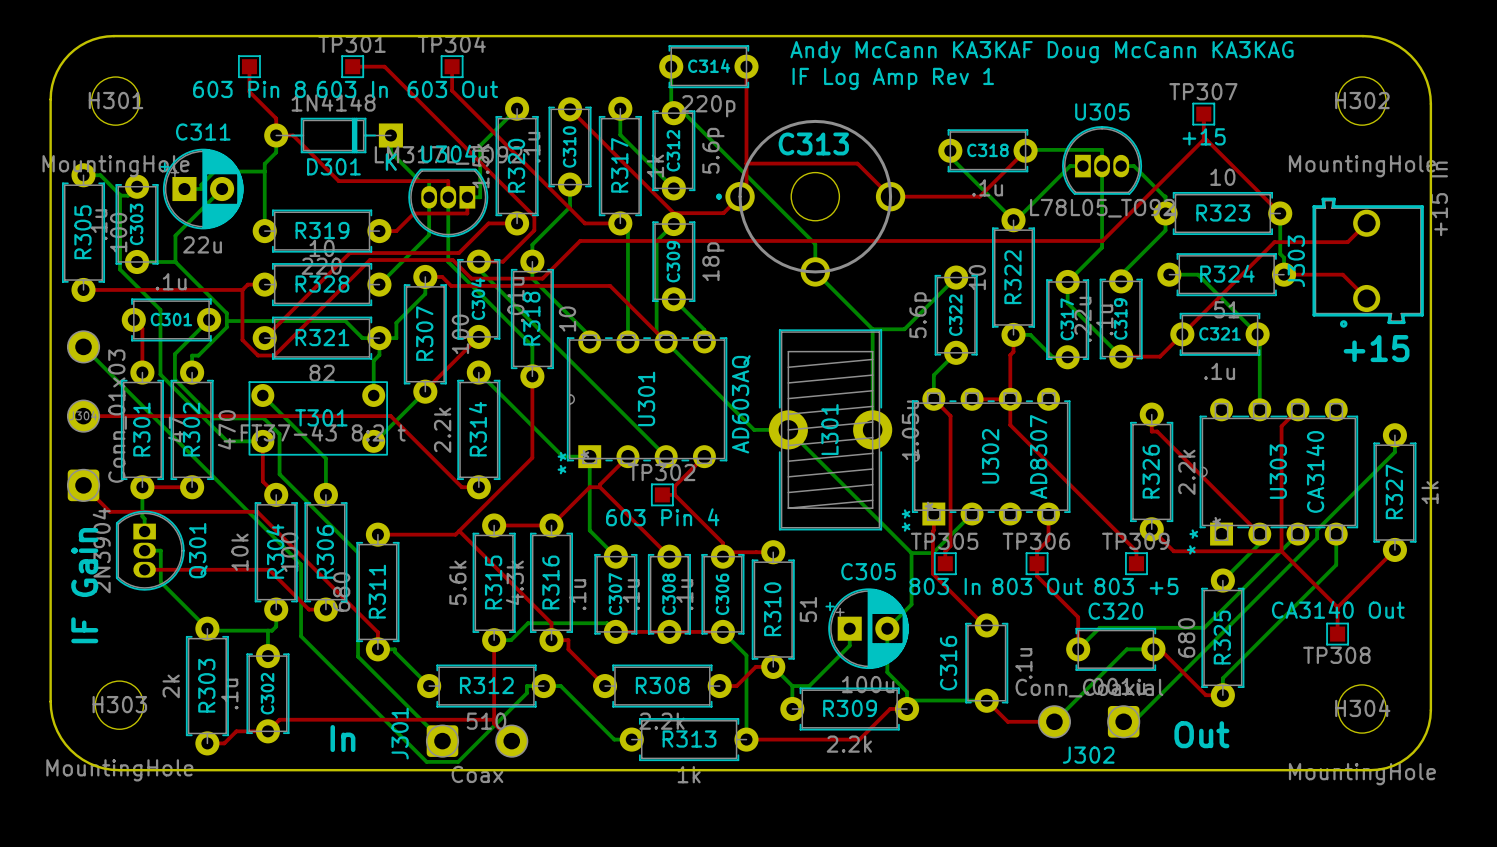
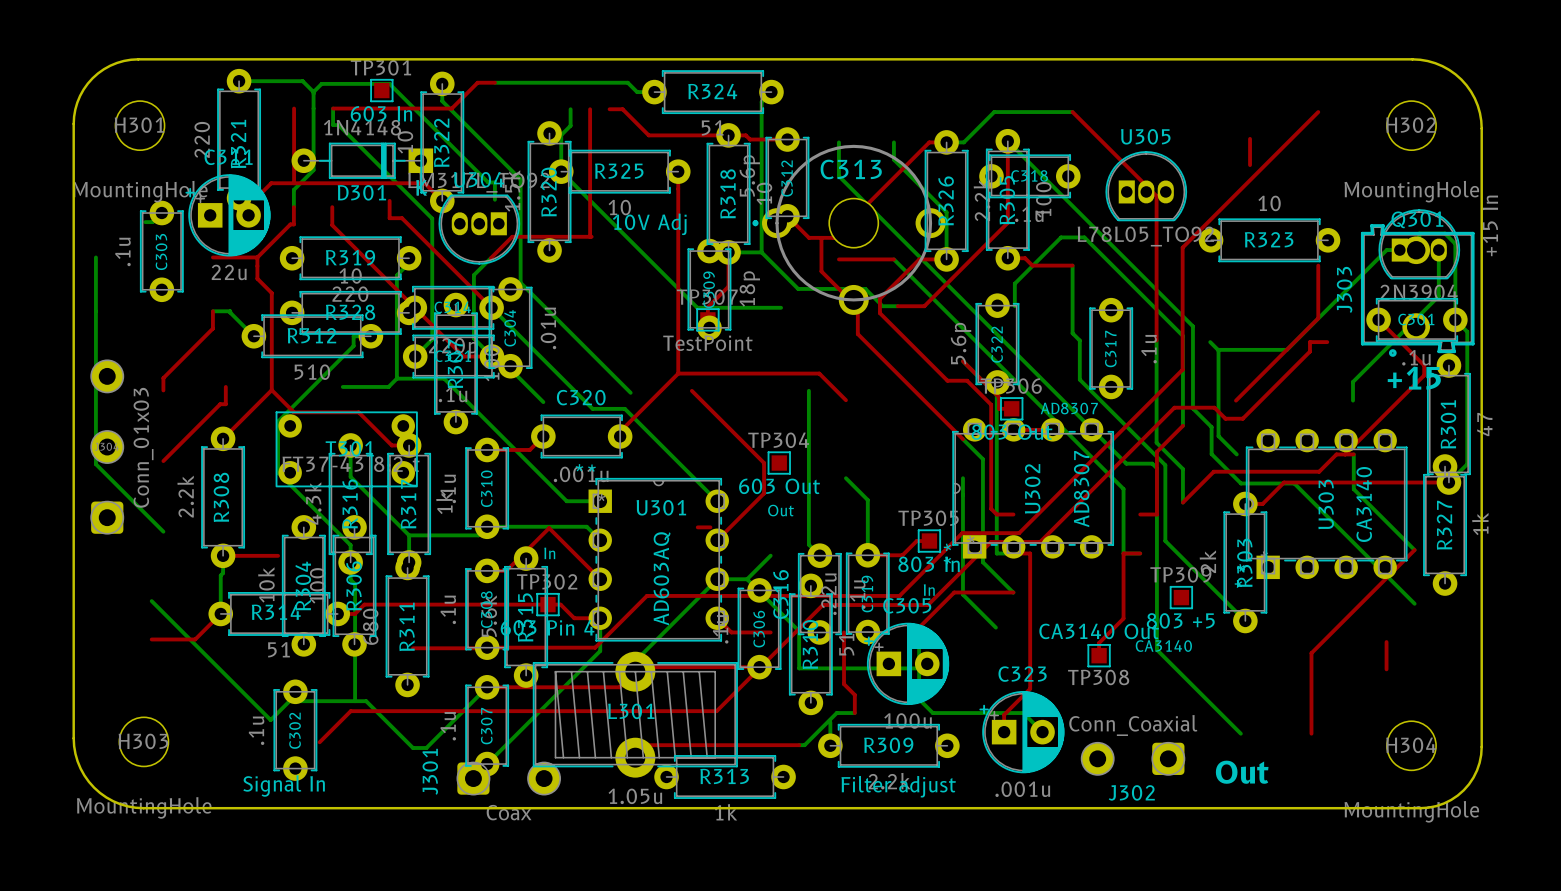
text: Andy McCann KA3KAF Doug McCann KA3KAG (1041, 52) -> none
bottom track: none -> (239, 81) (302, 81) (313, 92)
bottom track: none -> (494, 82) (627, 82) (637, 92) (654, 92)
top track: none -> (494, 82) (477, 82) (451, 108) (333, 108)
bottom track: none -> (442, 83) (442, 101) (520, 179) (520, 282) (630, 392)
top track: (249, 66) (249, 91) (276, 118) (276, 135) (293, 135) (338, 181) (448, 181) (448, 197) -> none
part: 603 Pin 8 (249, 66) -> none
top track: (352, 66) (384, 66) (534, 216) (534, 230) (503, 261) (478, 261) -> none
top track: (452, 66) (452, 90) (584, 223) (620, 223) -> none
TP304 position: (452, 66) -> (779, 463)
bottom track: (671, 66) (671, 110) (673, 113) (684, 113) (815, 244) (815, 271) (872, 329) -> none
C314 position: (708, 66) -> (453, 307)
top track: (746, 66) (746, 190) (723, 213) (673, 213) -> none
bottom track: none -> (313, 92) (313, 170) (293, 189) (293, 207)
bottom track: none -> (313, 92) (321, 83) (389, 83) (488, 182) (494, 182) (494, 199)
bottom track: none -> (771, 92) (761, 101) (761, 252)
text: IF Log Amp Rev 1 (893, 78) -> none
top track: none -> (294, 108) (294, 183)
bottom track: none -> (333, 108) (333, 125) (338, 125) (432, 218) (432, 339) (415, 356)
bottom track: none -> (570, 109) (570, 125) (561, 135) (561, 171) (697, 307) (781, 307)
top track: none -> (590, 109) (590, 236)
top track: none -> (609, 109) (622, 109) (648, 135) (745, 135) (749, 139) (787, 139)
bottom track: none -> (1072, 112) (994, 112) (963, 142) (946, 142)
top track: none -> (1072, 112) (1156, 196) (1156, 340)
top track: none -> (1318, 112) (1182, 247) (1182, 369) (1019, 533) (962, 533) (899, 595) (646, 595) (595, 647) (413, 648)
bottom track: (517, 108) (480, 145) (480, 197) (467, 197) -> none
bottom track: (620, 108) (620, 134) (673, 188) -> none
top track: (570, 109) (673, 213) -> none
TP307 position: (1203, 114) -> (707, 319)
bottom track: none -> (1007, 141) (1192, 326) (1192, 408) (1211, 427) (1211, 454) (1240, 483) (1294, 483) (1414, 603)
top track: none -> (1007, 141) (1007, 222) (924, 306) (897, 306)
bottom track: none -> (838, 142) (838, 176) (1126, 463) (1152, 463) (1156, 468) (1156, 649) (1240, 733)
bottom track: none -> (893, 142) (893, 159) (946, 212) (946, 259)
top track: none -> (946, 142) (929, 142) (833, 237) (809, 237) (787, 216)
bottom track: (276, 135) (276, 152) (264, 163) (264, 231) -> none
bottom track: (390, 135) (390, 152) (419, 181) (429, 181) (429, 234) (379, 284) -> none
TP307 value: +15 (1204, 136) -> TestPoint (707, 343)
C310 position: (570, 146) -> (487, 488)
top track: none -> (678, 171) (678, 373)
C312 position: (673, 150) -> (787, 177)
bottom track: (950, 150) (950, 157) (1013, 220) (1016, 220) (1070, 166) (1082, 166) -> none
bottom track: (1025, 150) (1102, 149) (1102, 247) (1067, 281) (1067, 303) (1121, 356) -> none
top track: (1025, 150) (979, 196) (890, 196) (857, 163) (746, 163) -> none
R317 position: (620, 166) -> (409, 503)
bottom track: (1121, 166) (1133, 166) (1165, 196) (1165, 230) (1121, 274) (1121, 281) -> none
bottom track: (264, 171) (214, 171) (201, 184) (201, 189) (184, 189) -> none
top track: none -> (239, 198) (256, 198) (271, 183) (424, 183) (442, 200)
top track: none -> (389, 200) (389, 218) (402, 218) (491, 307)
bottom track: (83, 175) (100, 175) (120, 195) (120, 269) (160, 309) (160, 374) (227, 441) (262, 441) -> none
top track: none -> (293, 207) (293, 224) (290, 224) (257, 257)
top track: none -> (332, 207) (332, 225) (463, 356) (491, 356)
bottom track: (570, 184) (570, 207) (532, 244) (532, 278) (589, 335) (589, 341) -> none
bottom track: (222, 189) (175, 235) (175, 261) -> none
bottom track: (448, 197) (448, 261) (532, 346) (532, 376) -> none
top track: (467, 197) (467, 213) (413, 213) (396, 231) (379, 231) -> none
text: none -> 10V Adj (649, 224)
top track: none -> (591, 236) (512, 236) (490, 258)
top track: none -> (821, 237) (821, 271) (857, 307) (857, 334) (962, 439)
bottom track: (1280, 213) (1280, 253) (1284, 257) (1284, 274) -> none
top track: (1280, 213) (1206, 139) (1203, 139) (1102, 240) (580, 240) (542, 278) (471, 278) (452, 260) (369, 260) (274, 355) (258, 355) (242, 339) (242, 289) -> none
top track: (517, 223) (488, 223) (458, 253) (349, 253) (264, 338) -> none
bottom track: (620, 223) (627, 231) (627, 341) -> none
bottom track: none -> (1399, 250) (1386, 250) (1286, 349) (1218, 349) (1210, 342)
top track: (1366, 223) (1347, 242) (1274, 242) (1160, 356) (1121, 356) -> none
bottom track: none -> (1419, 250) (1419, 233) (1445, 233) (1455, 243) (1455, 319) (1467, 331) (1467, 464) (1448, 482)
bottom track: none -> (1438, 250) (1438, 296) (1353, 381) (1353, 400)
bottom track: (673, 224) (656, 241) (656, 332) (754, 429) (788, 429) (911, 553) -> none
bottom track: none -> (728, 252) (761, 252)
top track: none -> (728, 252) (728, 286) (707, 307) (707, 319)
bottom track: none -> (761, 252) (798, 288) (865, 288) (880, 306) (897, 306)
bottom track: none -> (95, 257) (95, 464) (163, 531)
top track: none -> (212, 257) (257, 257)
top track: none -> (257, 257) (257, 278) (271, 293) (271, 390)
bottom track: none -> (414, 258) (396, 275) (396, 378)
bottom track: none -> (490, 258) (473, 275) (473, 338) (491, 356) (497, 356) (543, 402)
top track: none -> (1007, 258) (1025, 258) (1032, 265) (1072, 265)
R305 position: (83, 232) -> (1007, 199)
top track: none -> (838, 259) (893, 259)
bottom track: none -> (893, 259) (1123, 489) (1123, 553) (1140, 553)
top track: none -> (946, 259) (919, 259) (879, 298) (879, 313) (947, 380) (967, 380) (991, 404) (991, 508) (996, 514) (1013, 514)
bottom track: none -> (1072, 265) (1072, 333) (1079, 340) (1079, 379) (1165, 465) (1165, 540) (1245, 620)
top track: none -> (1318, 265) (1318, 318) (1235, 400)
bottom track: (137, 261) (175, 261) -> none
bottom track: (175, 261) (226, 313) (226, 327) (198, 355) (192, 355) (192, 372) -> none
bottom track: (478, 261) (478, 269) (666, 456) -> none
bottom track: (1169, 274) (1197, 274) (1259, 336) (1259, 409) -> none
R324 position: (1226, 274) -> (712, 92)
top track: (1284, 274) (1342, 274) (1366, 298) -> none
bottom track: (425, 276) (425, 293) (396, 322) (396, 338) (362, 338) (345, 321) (226, 321) -> none
top track: (425, 276) (442, 276) (451, 285) (610, 285) (666, 341) -> none
bottom track: (956, 277) (904, 329) (872, 329) -> none
R322 position: (1013, 277) -> (442, 142)
bottom track: none -> (1014, 306) (1014, 283) (1061, 237) (1084, 237) (1182, 335) (1182, 425)
bottom track: none -> (491, 307) (592, 408) (624, 408) (717, 501)
C301 value position: .1u (171, 281) -> .1u (1416, 357)
bottom track: none -> (212, 311) (230, 311) (253, 336)
top track: none -> (212, 311) (212, 328) (163, 378) (163, 390)
top track: (264, 284) (247, 284) (242, 289) -> none
top track: (83, 289) (242, 289) -> none
top track: none -> (1378, 319) (1424, 365) (1424, 375) (1345, 454)
bottom track: (673, 299) (704, 329) (704, 341) -> none
bottom track: none -> (370, 336) (353, 336) (353, 346) (278, 421) (278, 472) (350, 545) (350, 579) (355, 584) (355, 701)
bottom track: none -> (1156, 340) (1156, 442) (1182, 469) (1182, 502)
top track: none -> (1327, 342) (1309, 342) (1309, 351) (1242, 418) (1225, 418) (1214, 407) (1174, 407) (1040, 541) (991, 541) (928, 605) (822, 605) (716, 711) (350, 711) (319, 742)
top track: (133, 319) (142, 328) (142, 372) -> none
C301 position: (171, 319) -> (1416, 319)
bottom track: (209, 319) (174, 354) (174, 379) (213, 418) (263, 418) (279, 434) (279, 474) (358, 552) (358, 656) (442, 741) -> none
R318 position: (532, 319) -> (728, 193)
C319 position: (1121, 319) -> (867, 593)
bottom track: none -> (1218, 349) (1218, 436) (1236, 454)
bottom track: (872, 329) (872, 429) -> none
U301 footprint: [566, 330, 728, 469] -> [588, 477, 729, 642]
bottom track: none -> (962, 361) (996, 395) (996, 553) (1013, 553)
top track: none -> (962, 361) (999, 397) (999, 408) (1011, 408)
bottom track: (1013, 334) (1030, 334) (1052, 357) (1067, 357) -> none
top track: (1013, 334) (1013, 351) (1010, 355) (1010, 425) (1136, 551) (1136, 563) -> none
C321 position: (1219, 334) -> (453, 356)
top track: (478, 336) (425, 391) -> none
R321 rotation: 0° (322, 338) -> 90° clockwise (239, 139)
R321 position: (322, 338) -> (239, 139)
bottom track: (379, 338) (379, 355) (373, 360) (373, 395) -> none
top track: none -> (678, 373) (620, 431) (620, 436)
top track: none -> (678, 373) (819, 373) (845, 400)
bottom track: (83, 346) (301, 564) (301, 636) (426, 761) (458, 761) (526, 693) (526, 686) (560, 686) (614, 739) (631, 739) -> none
bottom track: none -> (396, 378) (444, 378) (566, 501) (600, 501)
bottom track: none -> (396, 378) (388, 386) (342, 386)
bottom track: (956, 352) (933, 375) (933, 399) -> none
top track: none -> (225, 386) (225, 404) (220, 404) (163, 461)
top track: none -> (271, 390) (293, 412) (358, 412) (391, 445) (409, 445)
top track: none -> (271, 390) (223, 438)
top track: none -> (691, 390) (764, 463) (764, 493) (717, 540)
bottom track: none -> (808, 390) (808, 544) (819, 555)
bottom track: (478, 372) (562, 456) (589, 456) (589, 530) (615, 556) -> none
R321 value: 82 (322, 373) -> 220 (202, 139)
top track: (532, 376) (532, 457) (455, 534) (377, 534) -> none
text: none -> AD8307 (1069, 408)
bottom track: (425, 391) (373, 441) -> none
bottom track: (262, 395) (325, 458) (325, 494) -> none
top track: none -> (1182, 425) (1156, 451) (1156, 514) (1140, 514)
U301 name position: U301 (646, 398) -> U301 (661, 507)
top track: (933, 399) (950, 416) (950, 546) (945, 551) (945, 563) -> none
U301 value position: AD603AQ (741, 404) -> AD603AQ (662, 578)
top track: none -> (543, 436) (529, 449) (487, 449)
bottom track: none -> (962, 439) (982, 459) (982, 562) (1013, 592)
top track: (1298, 409) (1281, 426) (1281, 551) -> none
bottom track: none -> (350, 445) (350, 476) (409, 535)
top track: (1151, 414) (1151, 431) (1157, 431) (1259, 534) -> none
top track: (83, 416) (390, 416) (461, 487) (478, 487) -> none
bottom track: none -> (1353, 454) (1353, 489) (1414, 550)
top track: none -> (1353, 454) (1336, 454) (1319, 471) (1213, 471) (1182, 502)
R301 position: (142, 429) -> (1448, 424)
R302: 470 (192, 429) -> none
R314 rotation: 0° (478, 429) -> 90° clockwise (279, 613)
R314 position: (478, 429) -> (279, 613)
L301 rotation: 0° (830, 429) -> 90° clockwise (635, 714)
L301 position: (830, 429) -> (635, 714)
R314 value: 2.2k (442, 430) -> 51 (278, 649)
bottom track: (1394, 435) (1394, 452) (1317, 529) (1317, 538) (1133, 721) (1123, 721) -> none
top track: (262, 441) (262, 481) (276, 494) -> none
bottom track: none -> (845, 478) (867, 500) (867, 555)
bottom track: none -> (962, 478) (962, 594) (995, 627)
top track: none -> (1448, 482) (1284, 482) (1262, 503) (1245, 503)
top track: (627, 456) (599, 484) (599, 487) -> none
top track: (704, 456) (674, 486) (674, 494) (722, 543) (722, 556) -> none
R326 position: (1151, 471) -> (946, 200)
text: none -> Out (781, 510)
top track: (83, 485) (109, 511) (257, 511) (377, 632) (377, 649) -> none
bottom track: (142, 487) (144, 531) -> none
top track: (142, 487) (192, 487) -> none
top track: (599, 487) (669, 556) -> none
top track: (599, 487) (589, 487) (551, 525) (494, 525) -> none
TP302 position: (662, 494) -> (547, 604)
bottom track: none -> (409, 535) (478, 535) (487, 526) (586, 526) (600, 540)
bottom track: none -> (409, 535) (409, 562)
top track: none -> (929, 541) (916, 541) (902, 555) (867, 555)
top track: (933, 514) (932, 573) (984, 625) (986, 625) -> none
bottom track: (972, 514) (932, 553) (911, 553) -> none
top track: (1048, 514) (1048, 539) (1037, 551) (1037, 576) (1078, 617) (1078, 649) -> none
top track: none -> (1414, 550) (1311, 653) (1311, 733)
text: none -> In (549, 553)
top track: none -> (1013, 553) (1030, 553) (1030, 688) (1004, 714) (1004, 732)
top track: none -> (1140, 553) (1123, 553) (1123, 618) (1099, 643) (1099, 655)
bottom track: none -> (223, 555) (223, 573) (220, 575) (220, 613)
top track: none -> (223, 555) (278, 555)
bottom track: none -> (770, 555) (747, 579)
top track: (1151, 529) (1173, 551) (1281, 551) -> none
top track: (459, 530) (551, 623) (551, 640) (568, 640) (568, 649) (605, 686) -> none
bottom track: (1259, 534) (1259, 543) (1222, 580) -> none
bottom track: (1298, 534) (1204, 627) (1099, 627) (1078, 649) -> none
bottom track: (1336, 534) (1336, 564) (1222, 678) (1222, 695) -> none
top track: none -> (487, 570) (506, 570) (549, 528) (600, 579)
bottom track: none -> (747, 579) (799, 631) (799, 668) (919, 668)
bottom track: none -> (747, 579) (717, 579) (635, 661) (635, 671)
top track: (1394, 549) (1337, 607) (1281, 551) -> none
bottom track: (144, 550) (160, 550) (160, 582) (209, 630) (272, 630) (276, 626) (276, 609) -> none
Q301 rotation: 0° (150, 550) -> 90° counterclockwise (1419, 244)
Q301 position: (150, 550) -> (1419, 244)
top track: (722, 552) (773, 552) -> none
bottom track: (911, 553) (911, 604) (887, 628) (887, 672) (907, 692) (907, 709) -> none
text: none -> In (929, 590)
top track: none -> (1013, 592) (954, 592) (919, 627)
TP305 position: (945, 563) -> (929, 541)
TP306 position: (1037, 563) -> (1011, 408)
bottom track: none -> (151, 601) (270, 720) (289, 701) (366, 701) (413, 748) (426, 748) (487, 687)
top track: (144, 569) (269, 569) (308, 609) (325, 609) -> none
top track: none -> (220, 613) (195, 639) (151, 639)
top track: none -> (337, 613) (355, 613) (364, 604) (560, 604) (574, 618) (600, 618)
R316 position: (551, 582) -> (350, 503)
bottom track: none -> (600, 618) (600, 650) (487, 764)
top track: none -> (717, 618) (731, 632) (770, 632)
text: IF Gain (84, 585) -> none
bottom track: none -> (919, 627) (919, 699) (932, 713) (1023, 713) (1042, 732)
C307 position: (615, 594) -> (487, 725)
C308 position: (669, 594) -> (487, 609)
top track: none -> (844, 632) (844, 684) (854, 694) (854, 713)
text: none -> CA3140 (1163, 646)
bottom track: (849, 628) (849, 645) (809, 686) (792, 686) (773, 666) -> none
bottom track: (267, 630) (267, 656) -> none
bottom track: (615, 631) (607, 623) (528, 623) (511, 640) (494, 640) -> none
bottom track: (722, 631) (746, 655) (746, 739) -> none
TP308 position: (1337, 634) -> (1099, 655)
top track: none -> (635, 671) (619, 687) (487, 687)
R325 value: 680 (1186, 637) -> 10 (619, 207)
R325 rotation: 0° (1222, 637) -> 90° clockwise (619, 171)
R325 position: (1222, 637) -> (619, 171)
top track: (494, 640) (494, 723) (511, 741) -> none
bottom track: (377, 649) (394, 649) (394, 651) (429, 686) -> none
C320 position: (1115, 649) -> (581, 436)
bottom track: (1153, 649) (1126, 649) (1054, 721) -> none
top track: (1153, 649) (1160, 649) (1205, 695) (1222, 695) -> none
C316 position: (986, 663) -> (819, 594)
top track: (773, 666) (755, 666) (736, 686) (719, 686) -> none
bottom track: none -> (854, 713) (836, 713) (804, 745) (799, 745)
R303 position: (207, 686) -> (1245, 562)
R312 position: (486, 686) -> (312, 336)
R308 rotation: 0° (662, 686) -> 90° clockwise (223, 497)
R308 position: (662, 686) -> (223, 497)
C323: none -> .001u (1021, 732)
bottom track: (907, 700) (986, 700) -> none
top track: (986, 700) (1007, 721) (1054, 721) -> none
top track: none -> (799, 745) (647, 745) (635, 757)
top track: (907, 709) (890, 709) (859, 739) (746, 739) -> none
top track: (494, 719) (279, 719) (267, 731) (236, 731) (224, 743) (207, 743) -> none
text: In (342, 738) -> none
text: none -> Signal In (284, 785)
text: none -> Filter adjust (898, 786)

